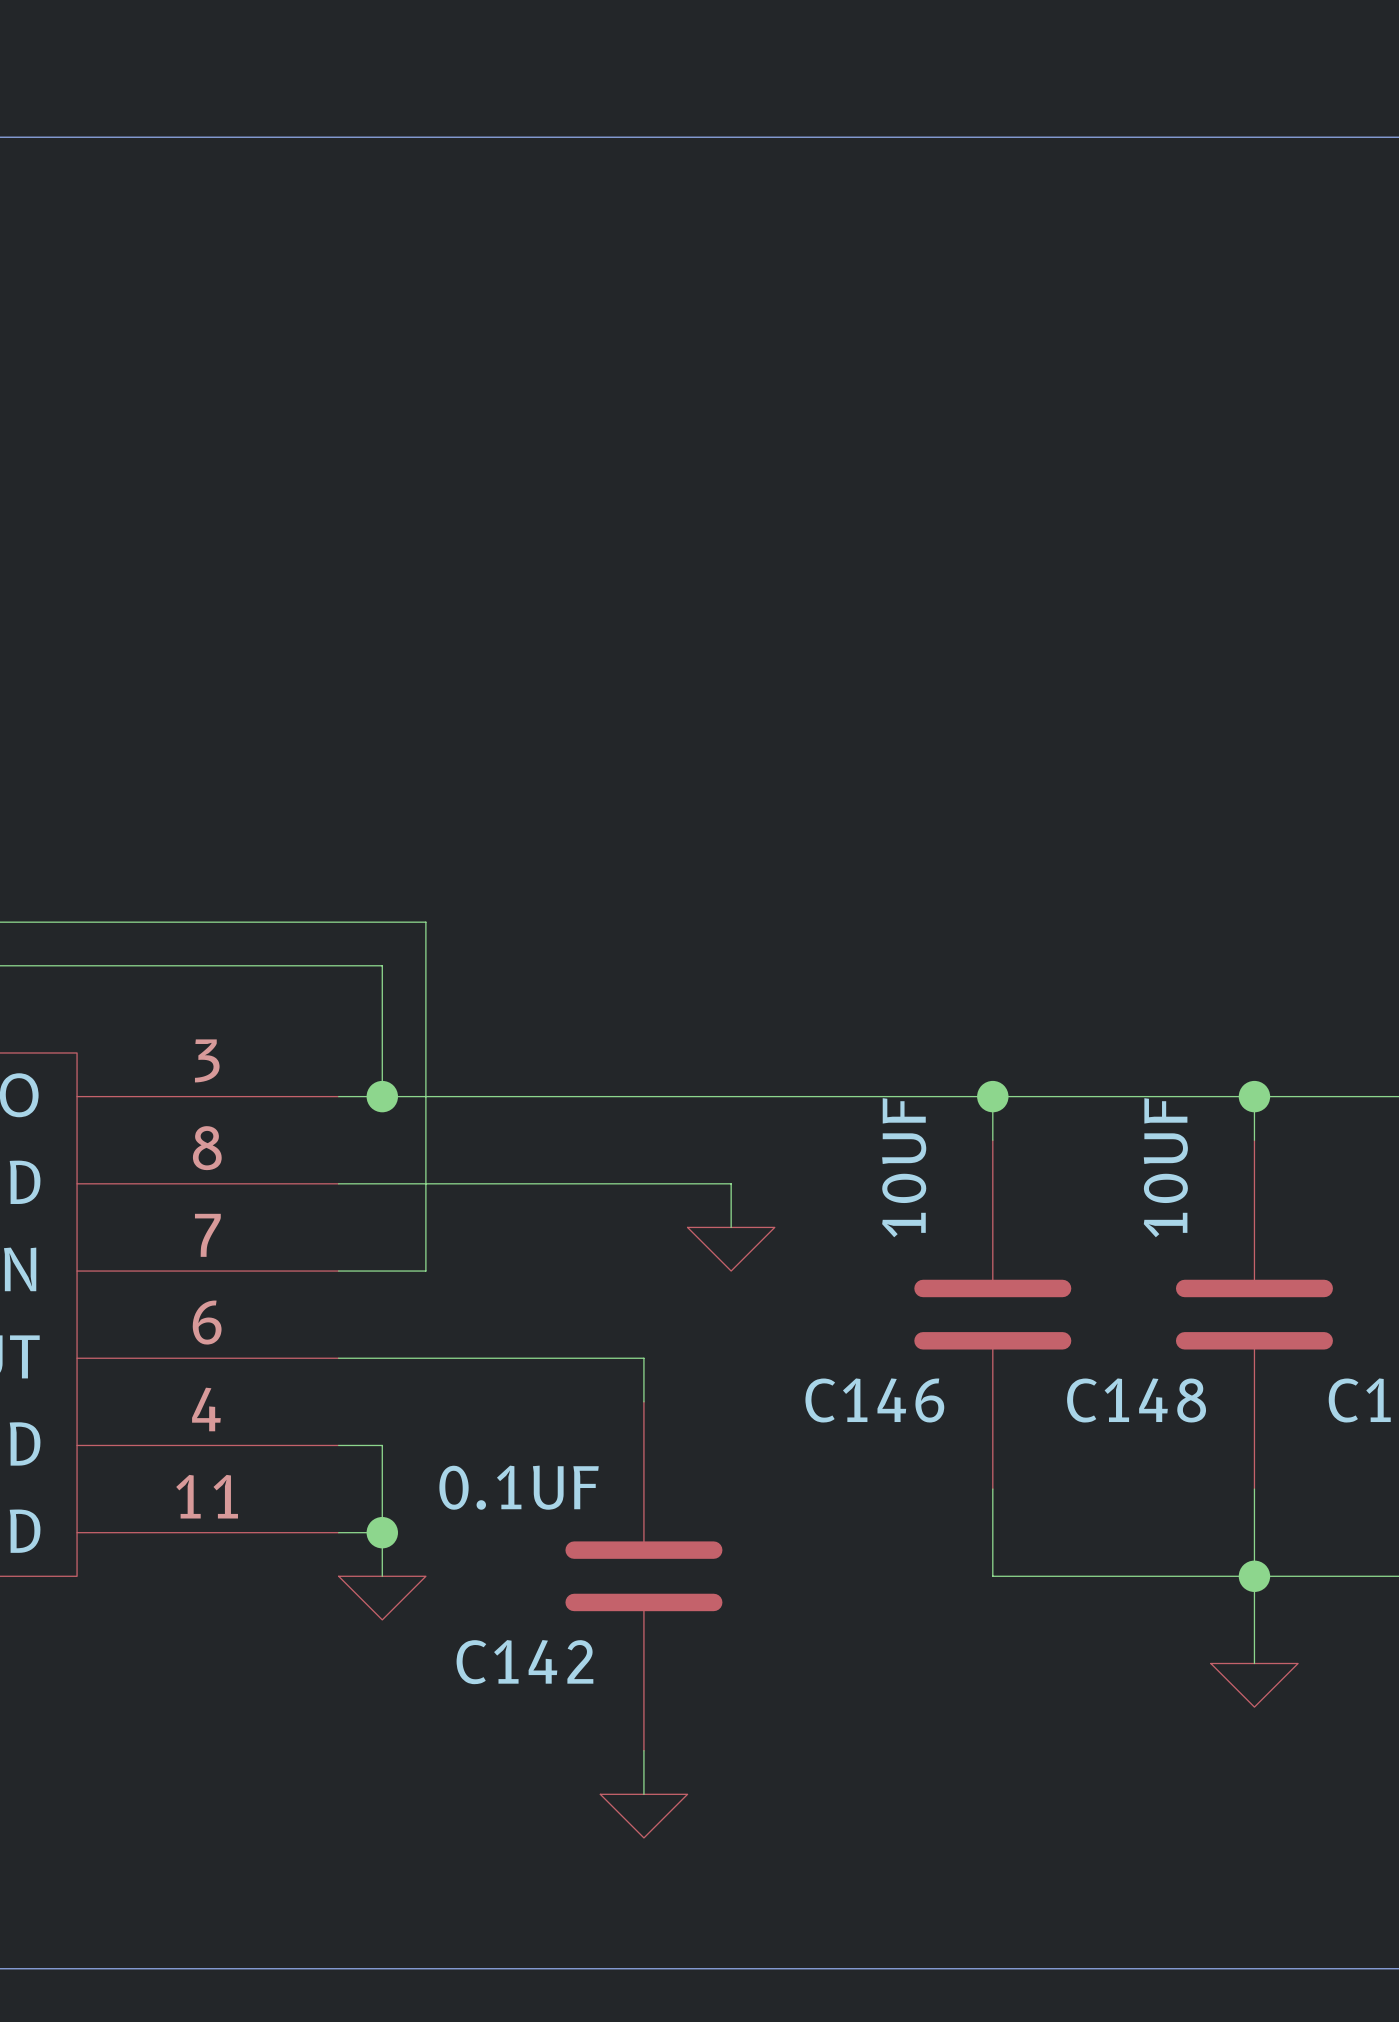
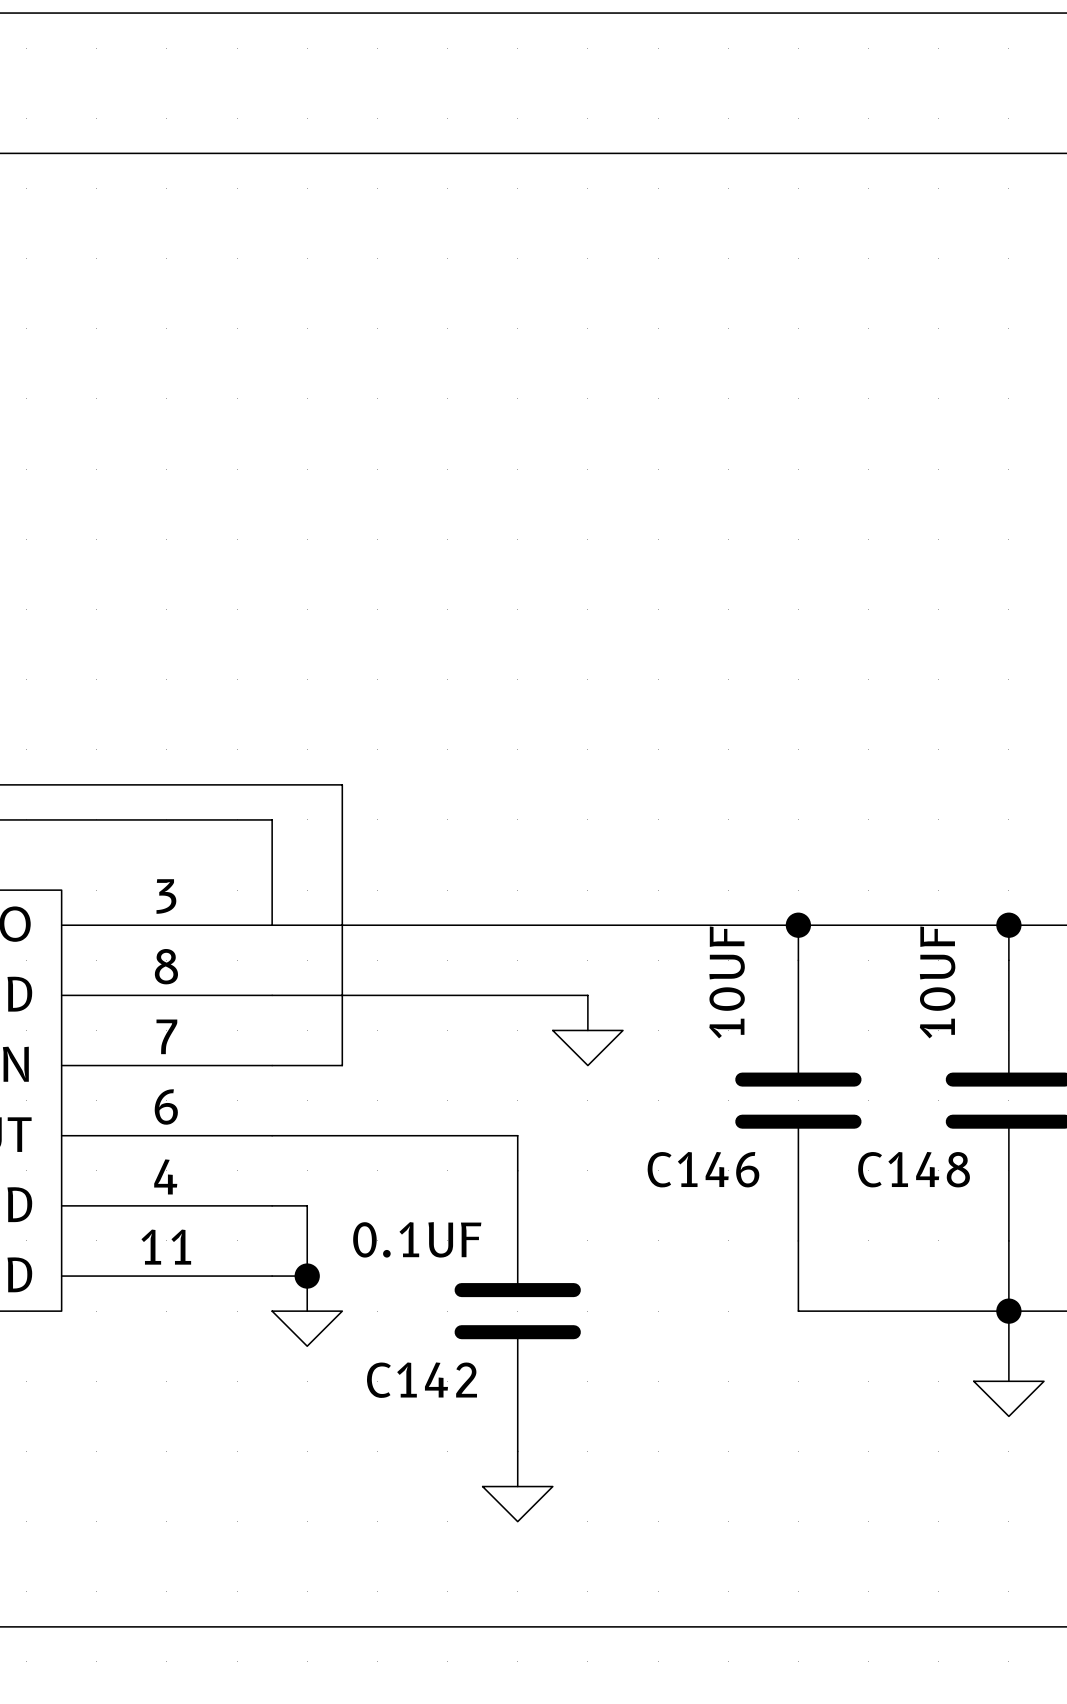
wire: (338, 965) (382, 965) (382, 1096) -> (272, 819) (272, 925)
junction: (382, 1096) -> none

